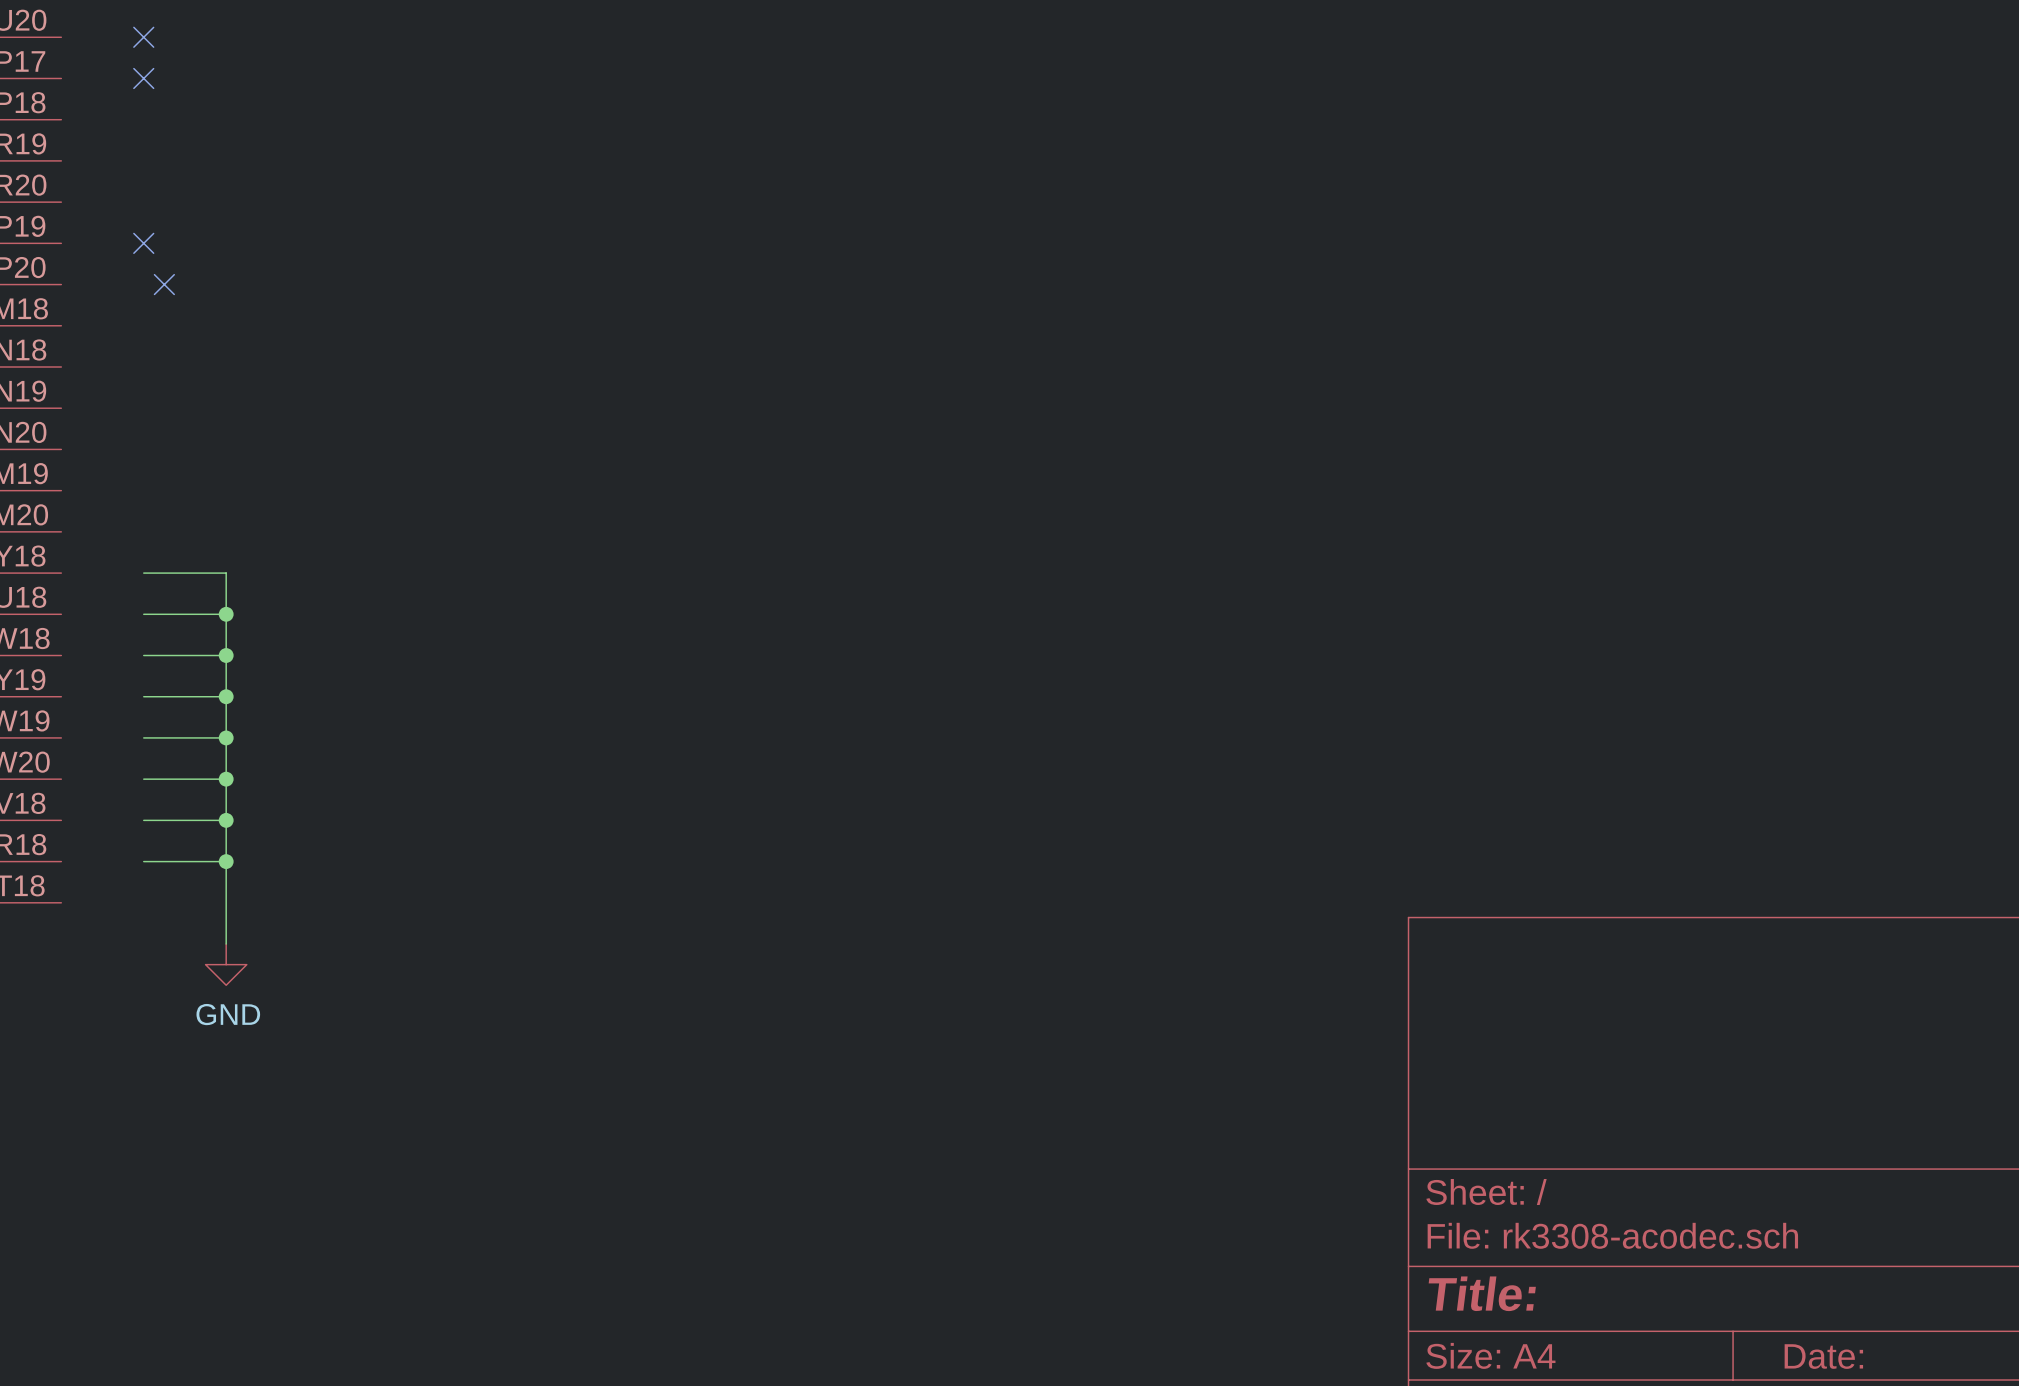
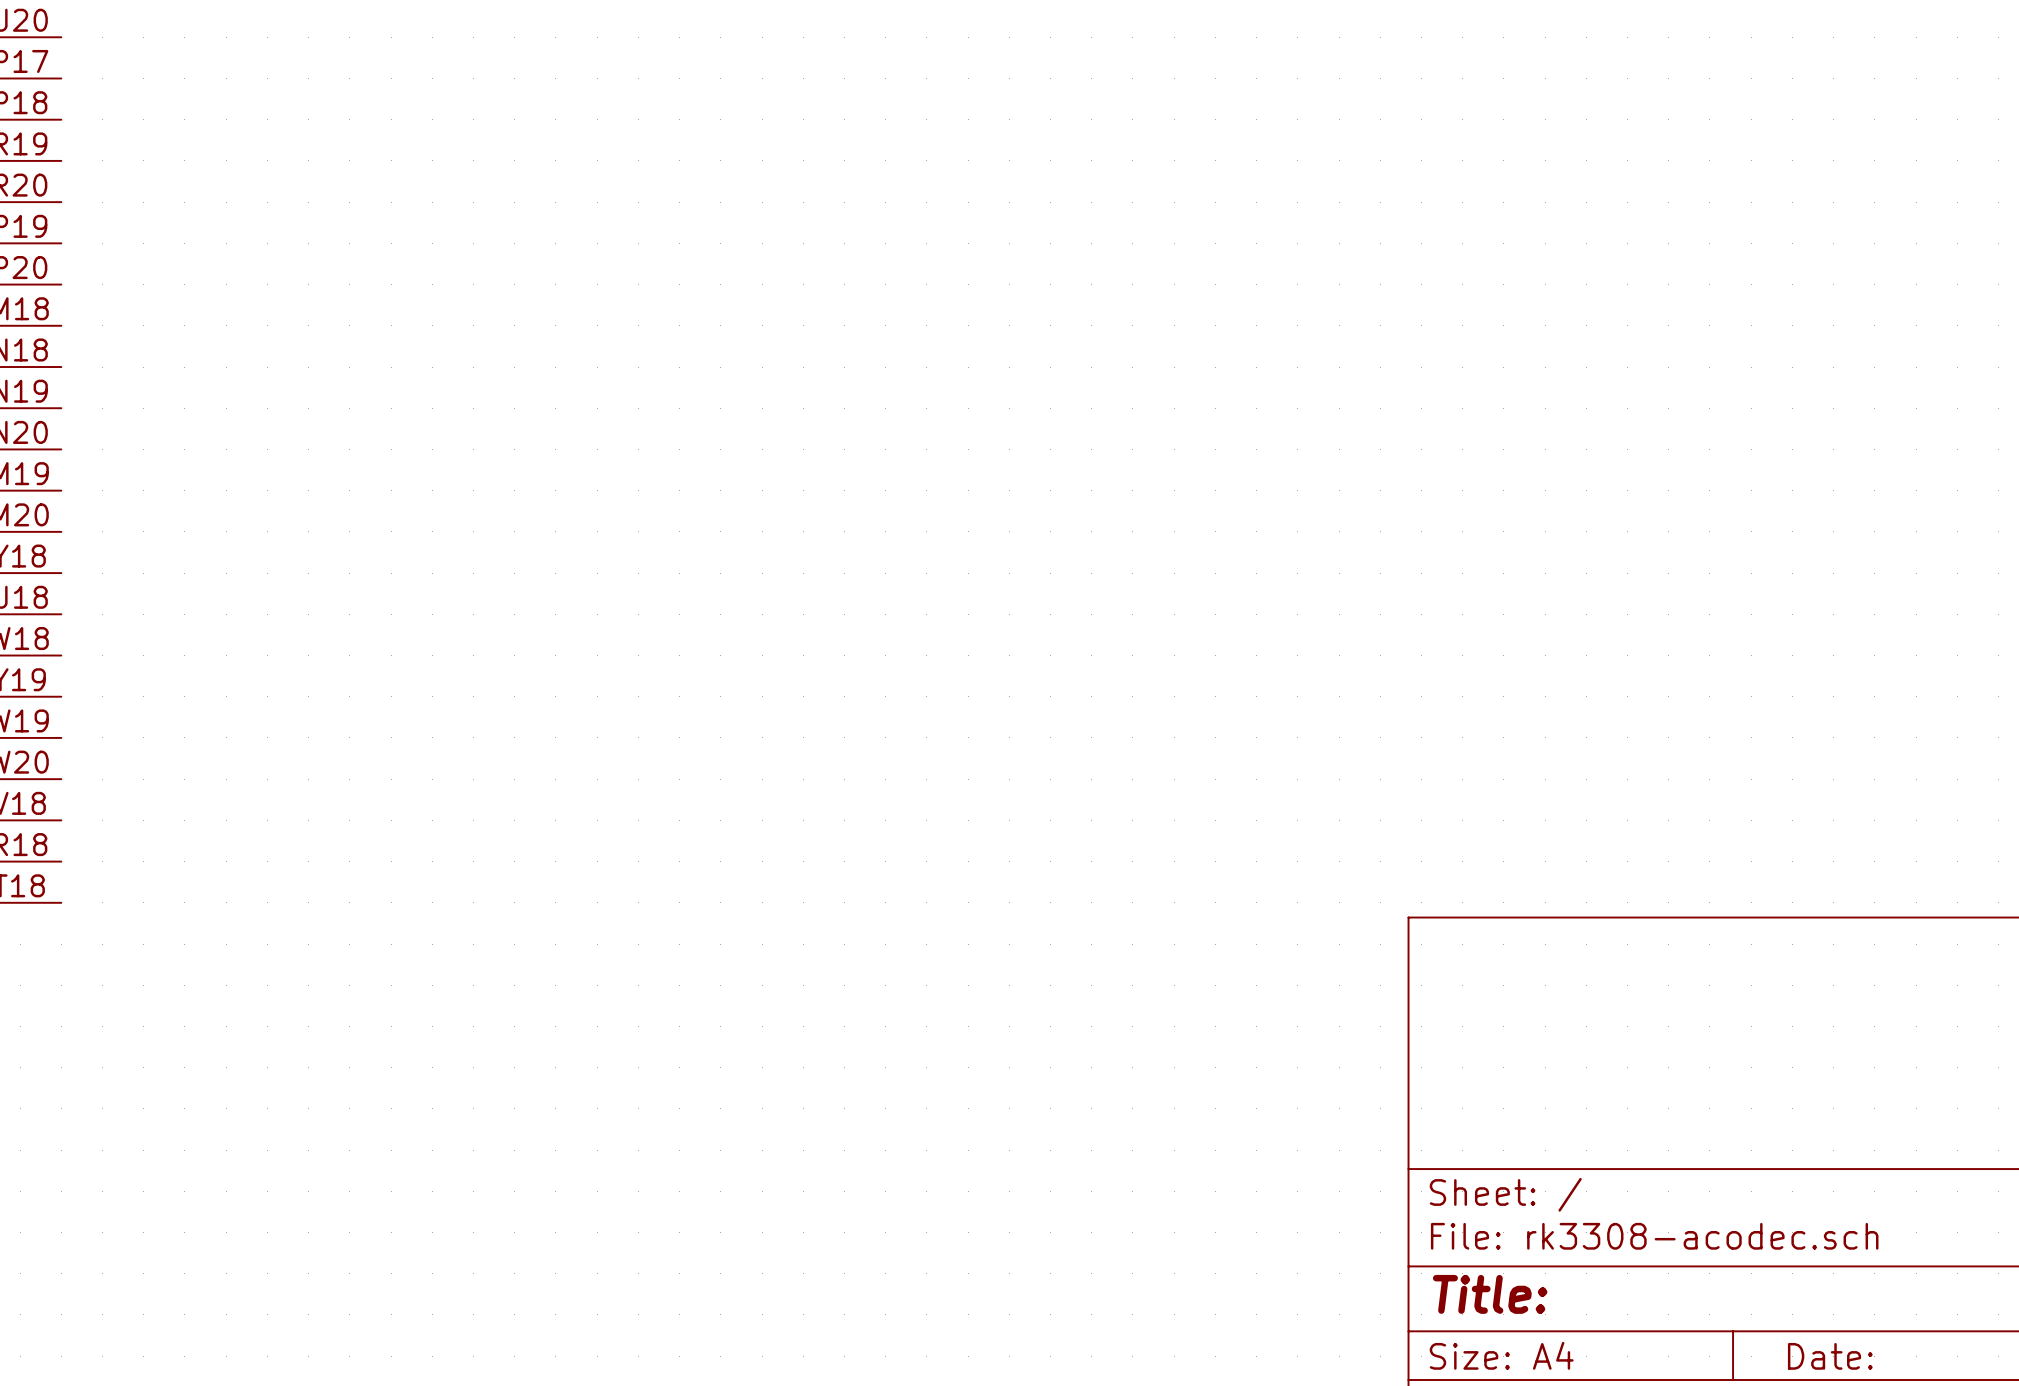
no-connect mark: (143, 37) -> none
no-connect mark: (143, 78) -> none
no-connect mark: (143, 243) -> none
no-connect mark: (164, 284) -> none
wire: (143, 573) (226, 573) (226, 944) -> none
wire: (143, 614) (226, 614) -> none
junction: (226, 614) -> none
wire: (143, 655) (226, 655) -> none
junction: (226, 655) -> none
wire: (143, 696) (226, 696) -> none
junction: (226, 696) -> none
wire: (143, 737) (226, 737) -> none
junction: (226, 737) -> none
wire: (143, 779) (226, 779) -> none
junction: (226, 779) -> none
wire: (143, 820) (226, 820) -> none
junction: (226, 820) -> none
wire: (143, 861) (226, 861) -> none
junction: (226, 861) -> none
power symbol: GND (226, 964) -> none

